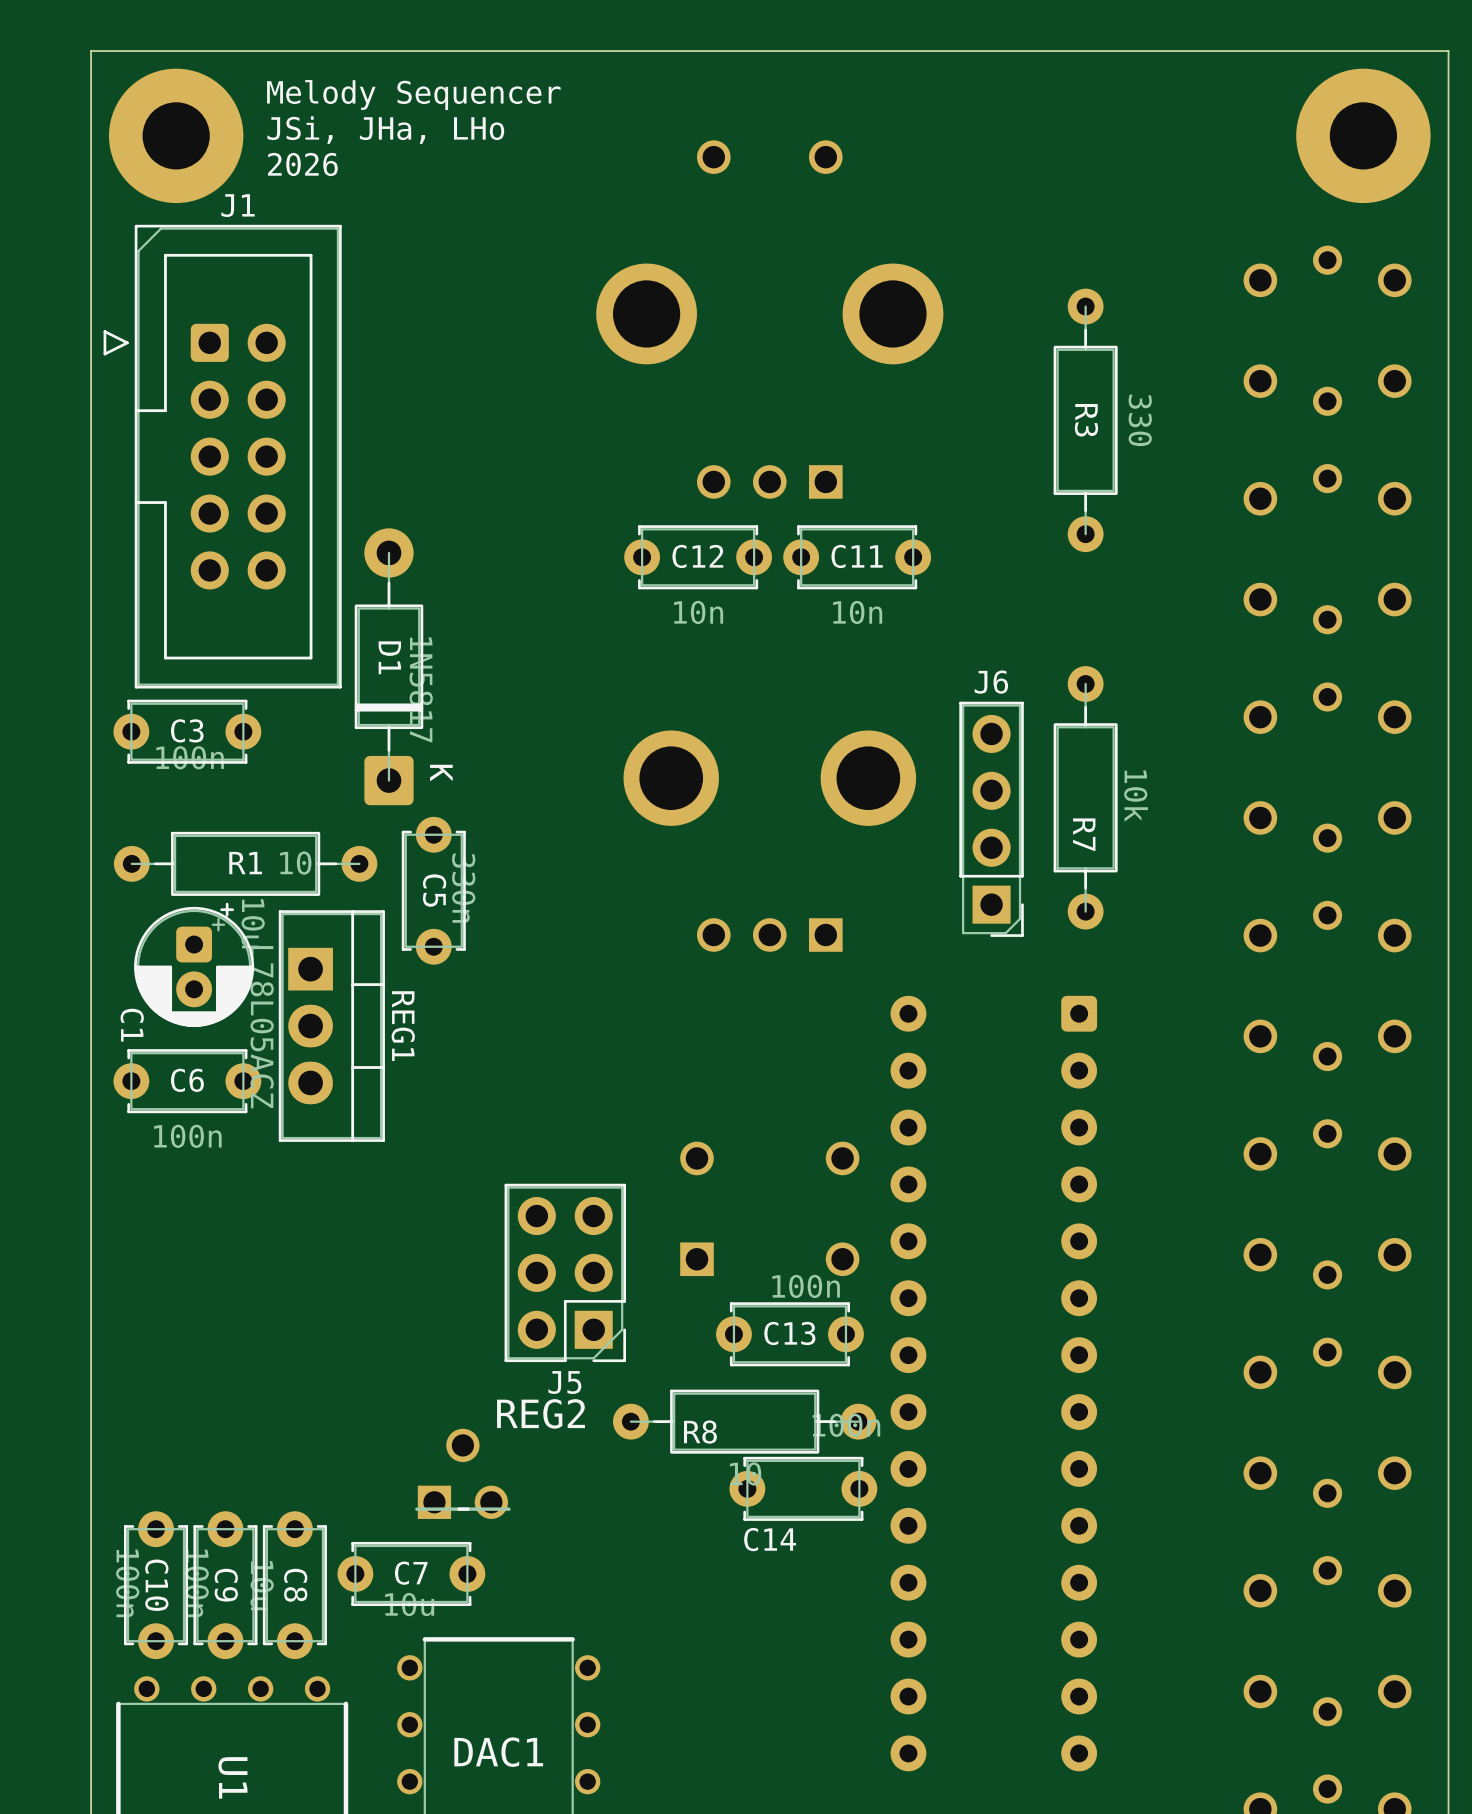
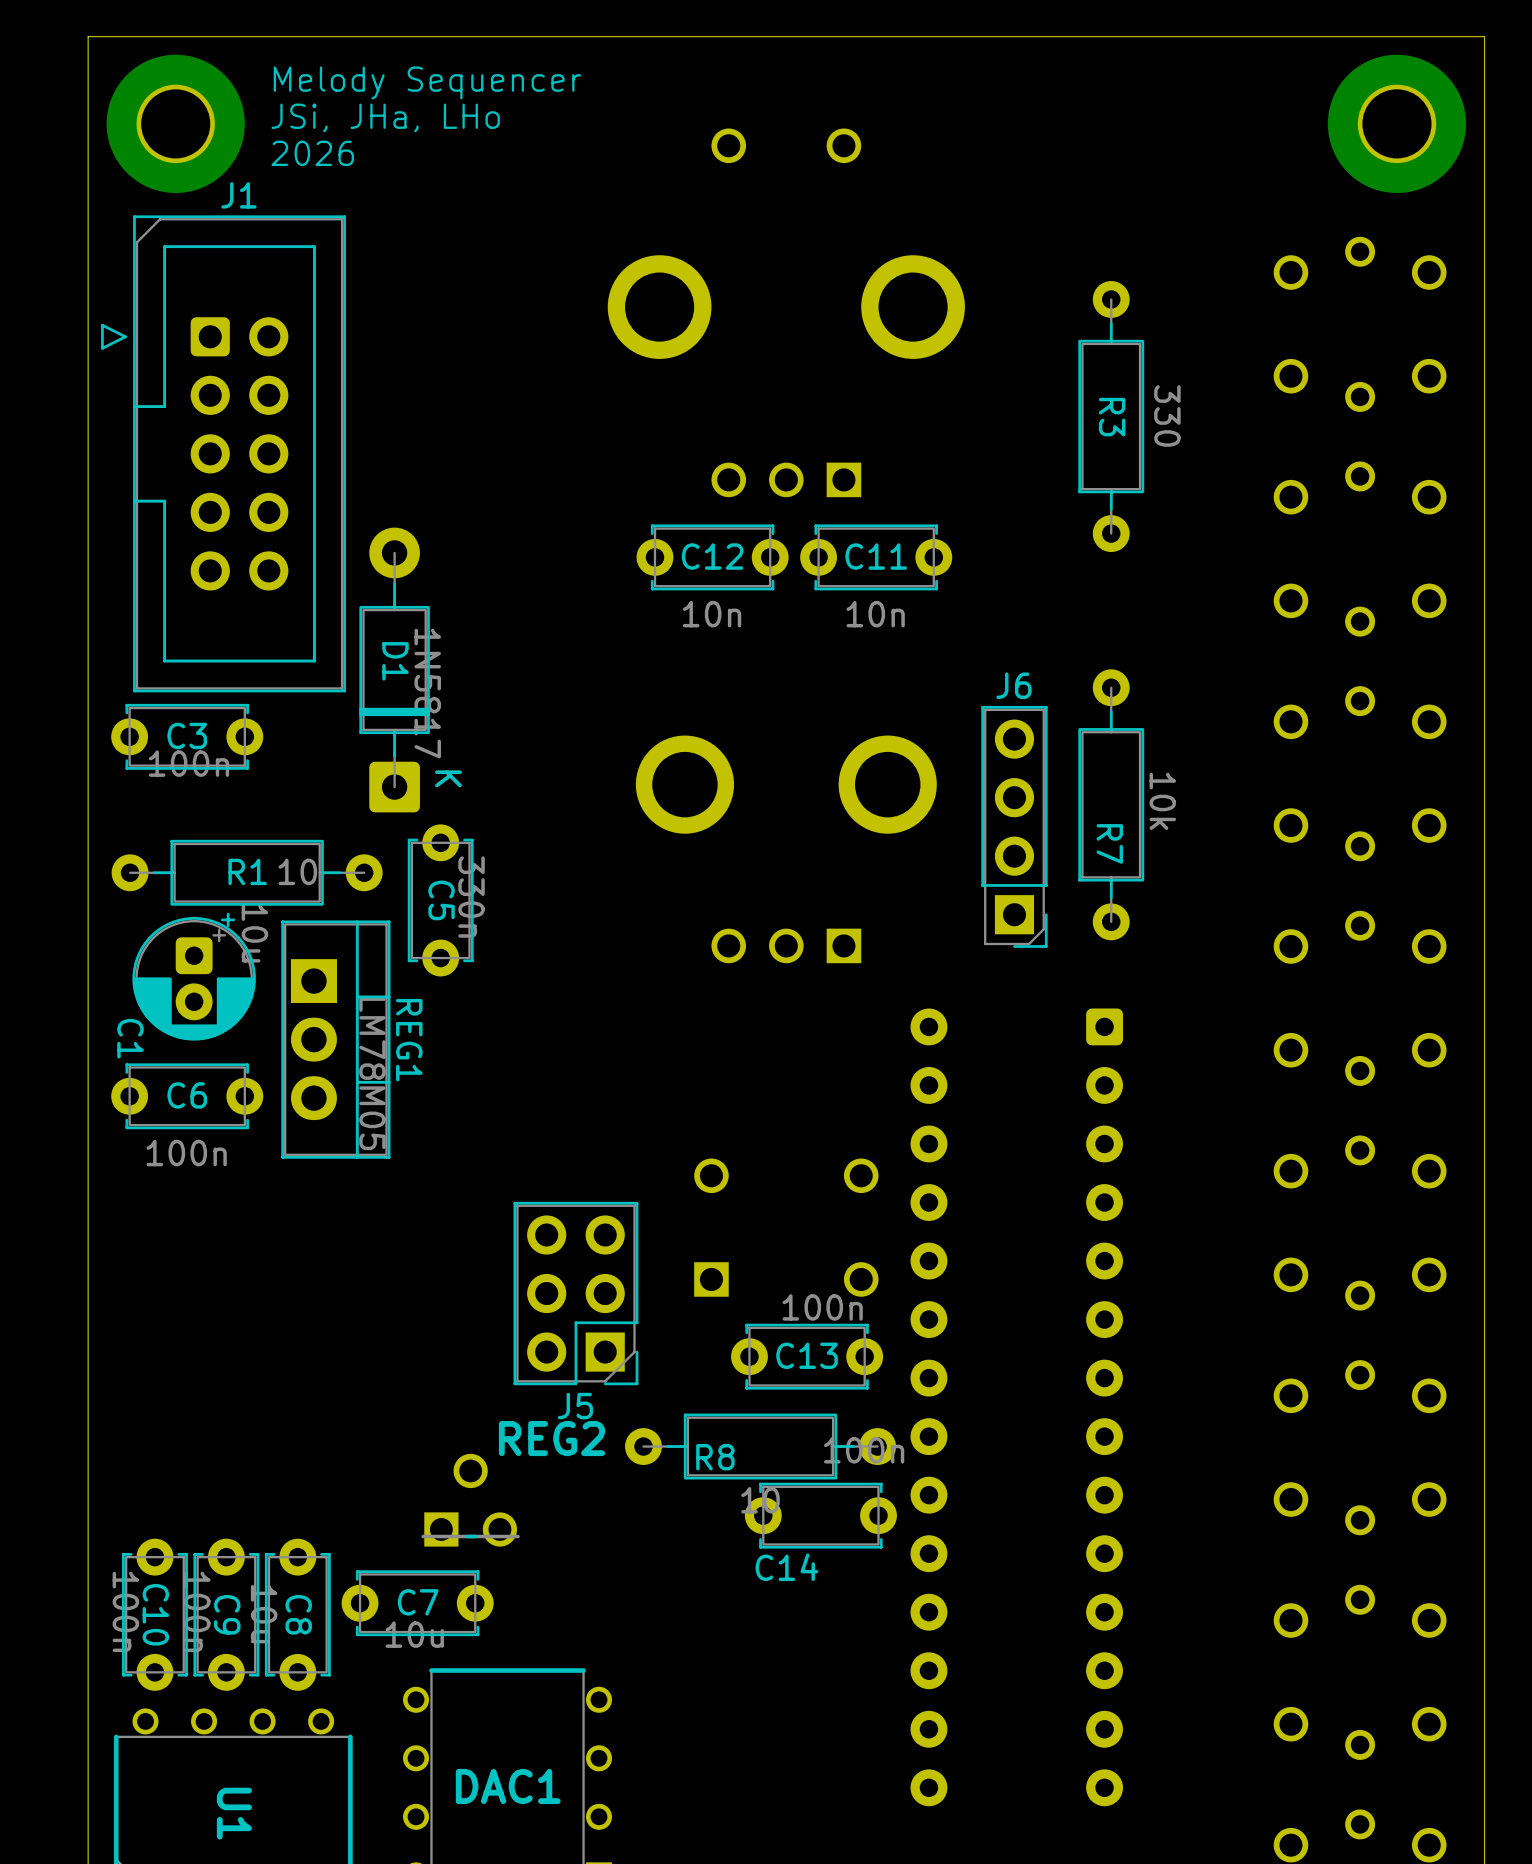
REG1 value: L78L05ACZ (262, 1027) -> LM78M05 (372, 1073)

